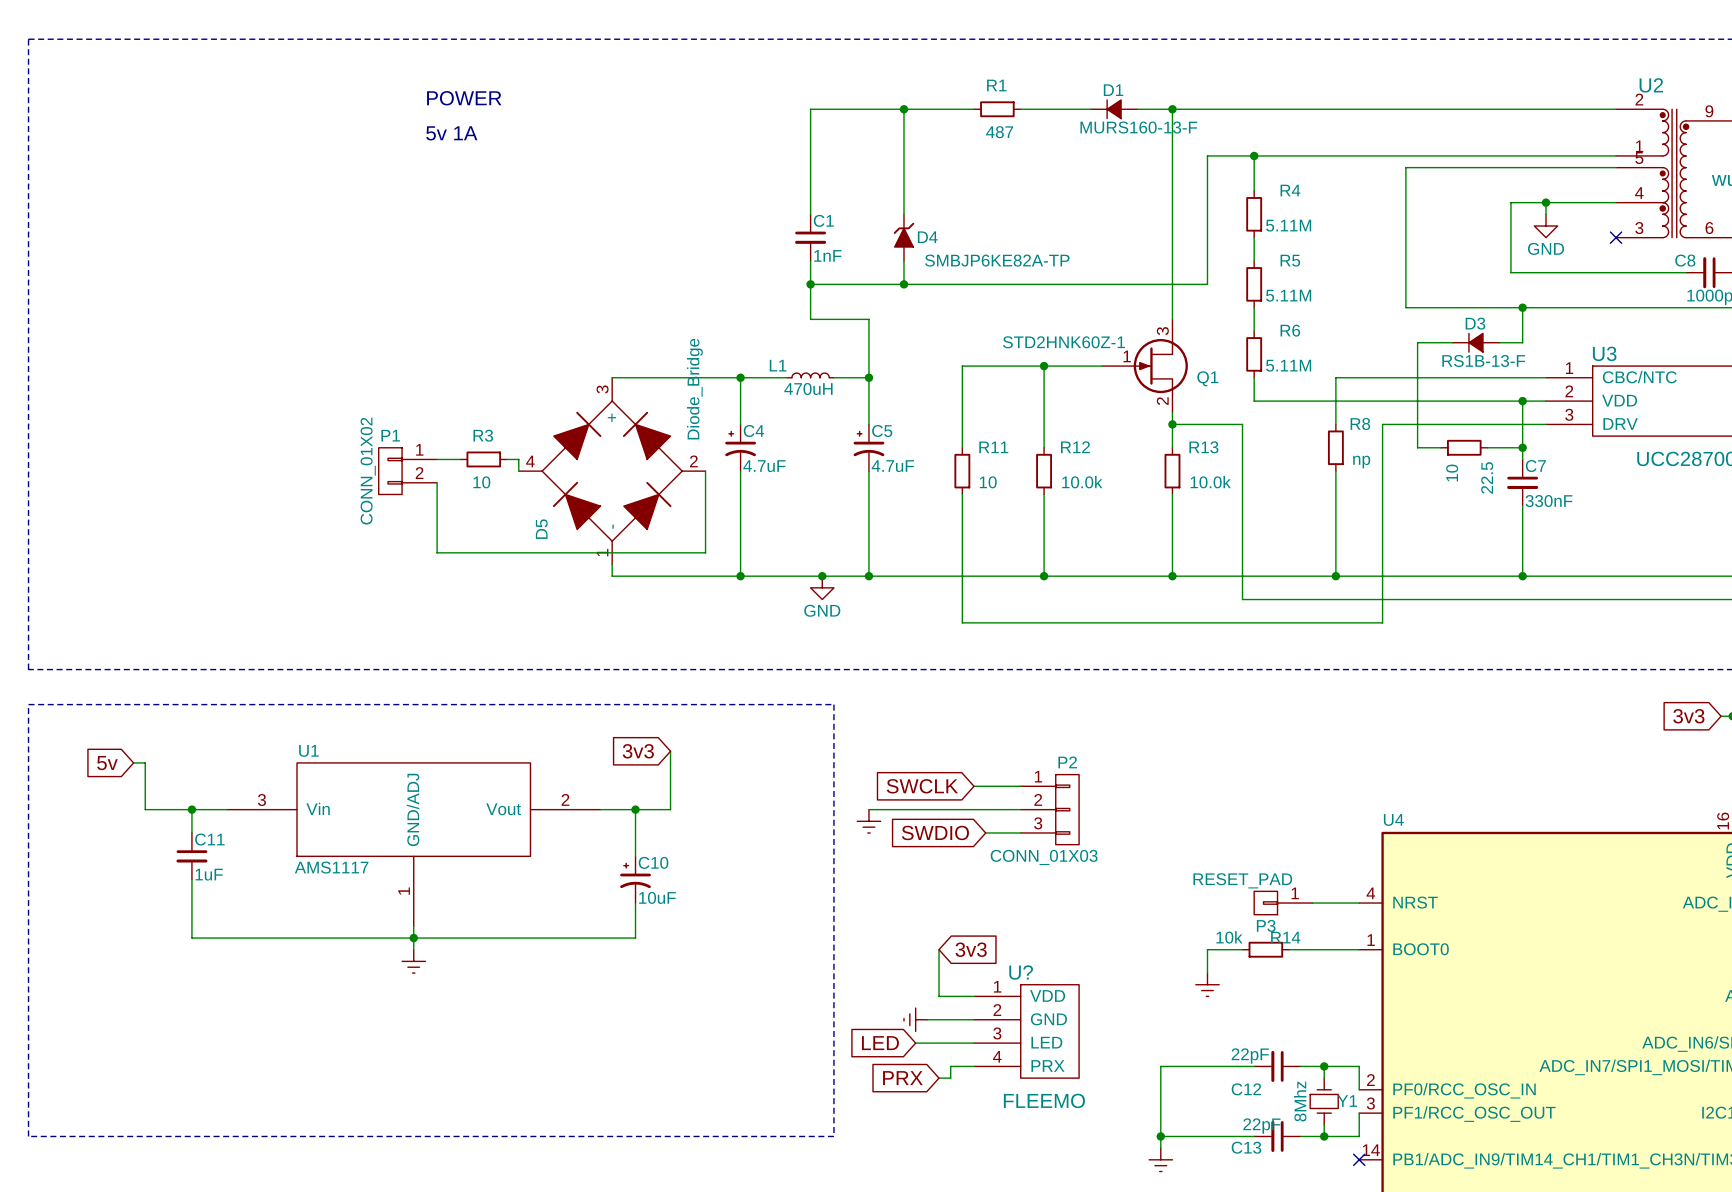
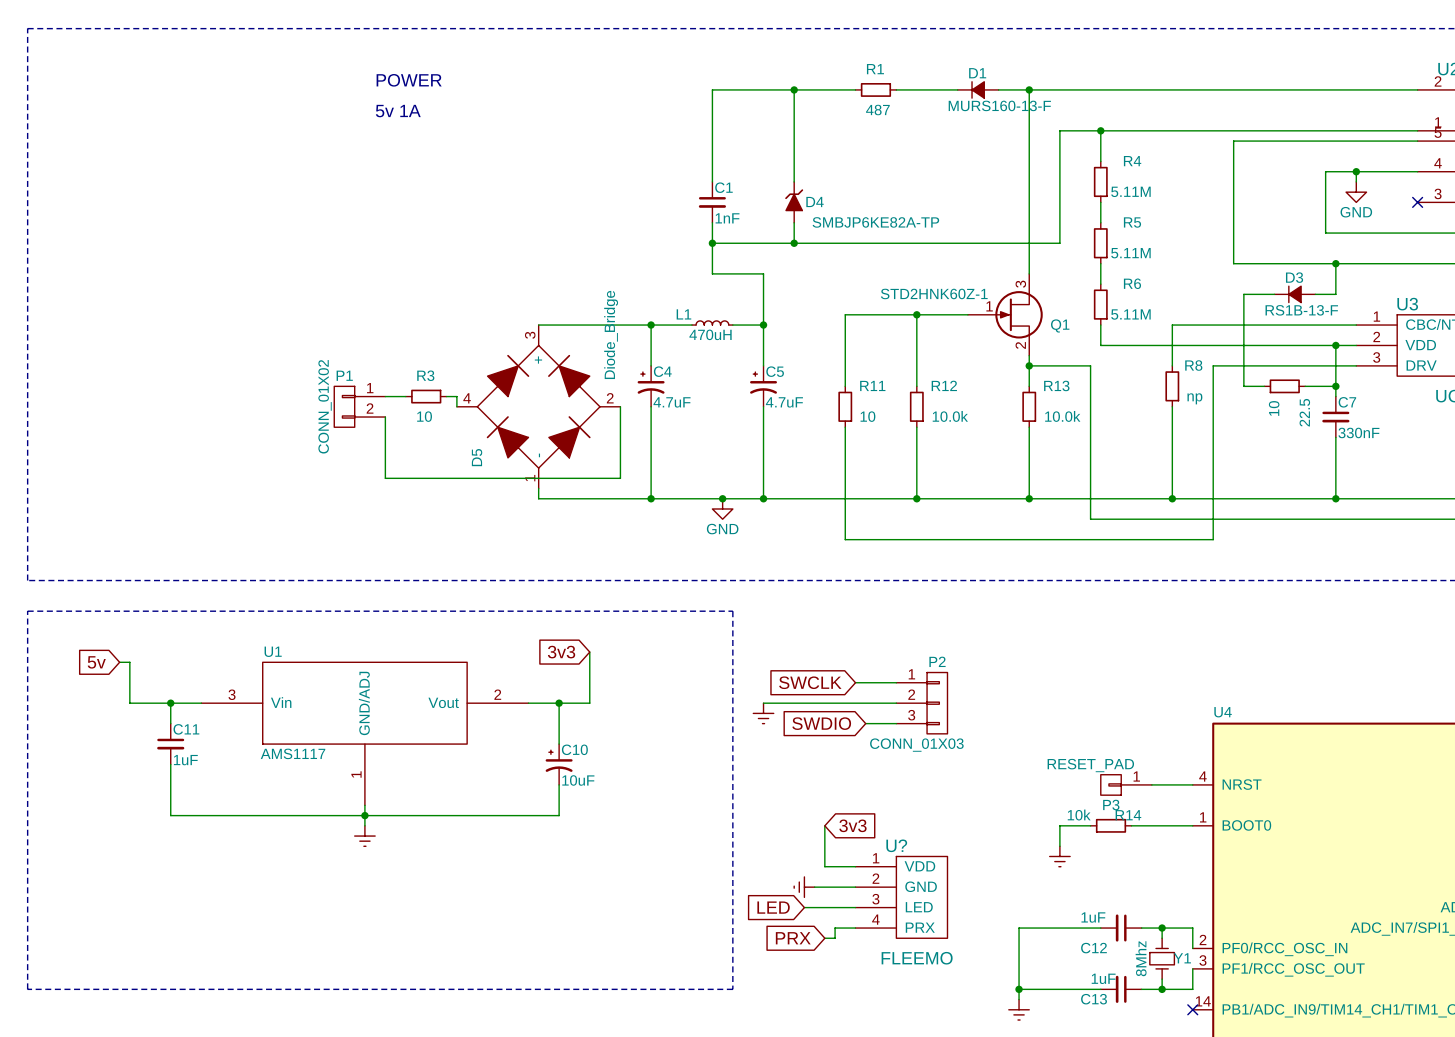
C12 value: 22pF (1250, 1056) -> 1uF (1093, 917)
C13 value: 22pF (1261, 1126) -> 1uF (1103, 978)

